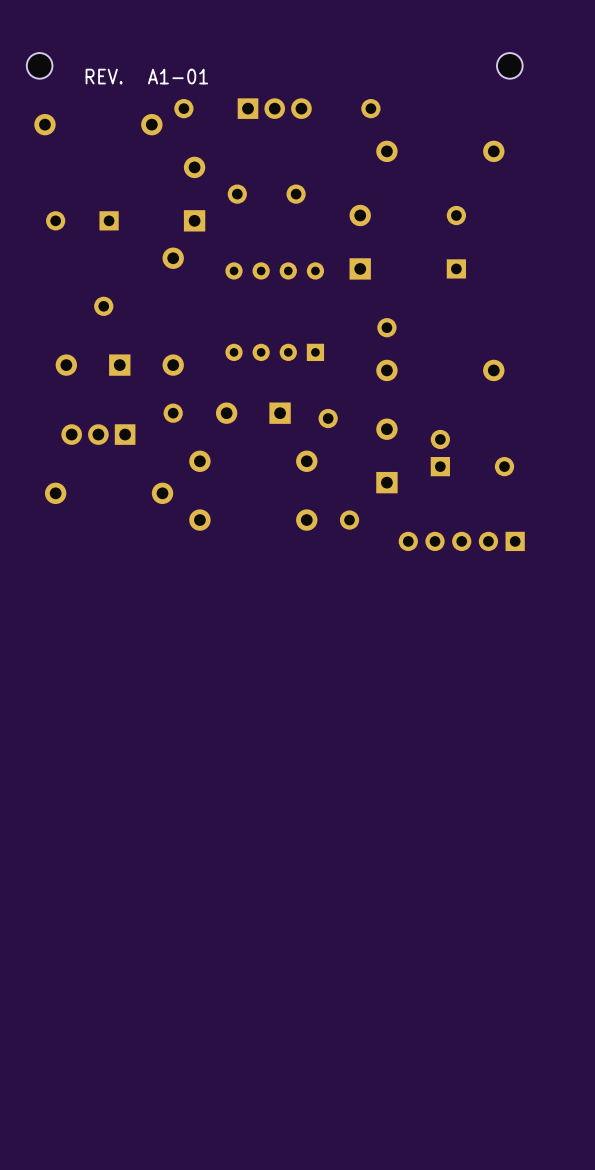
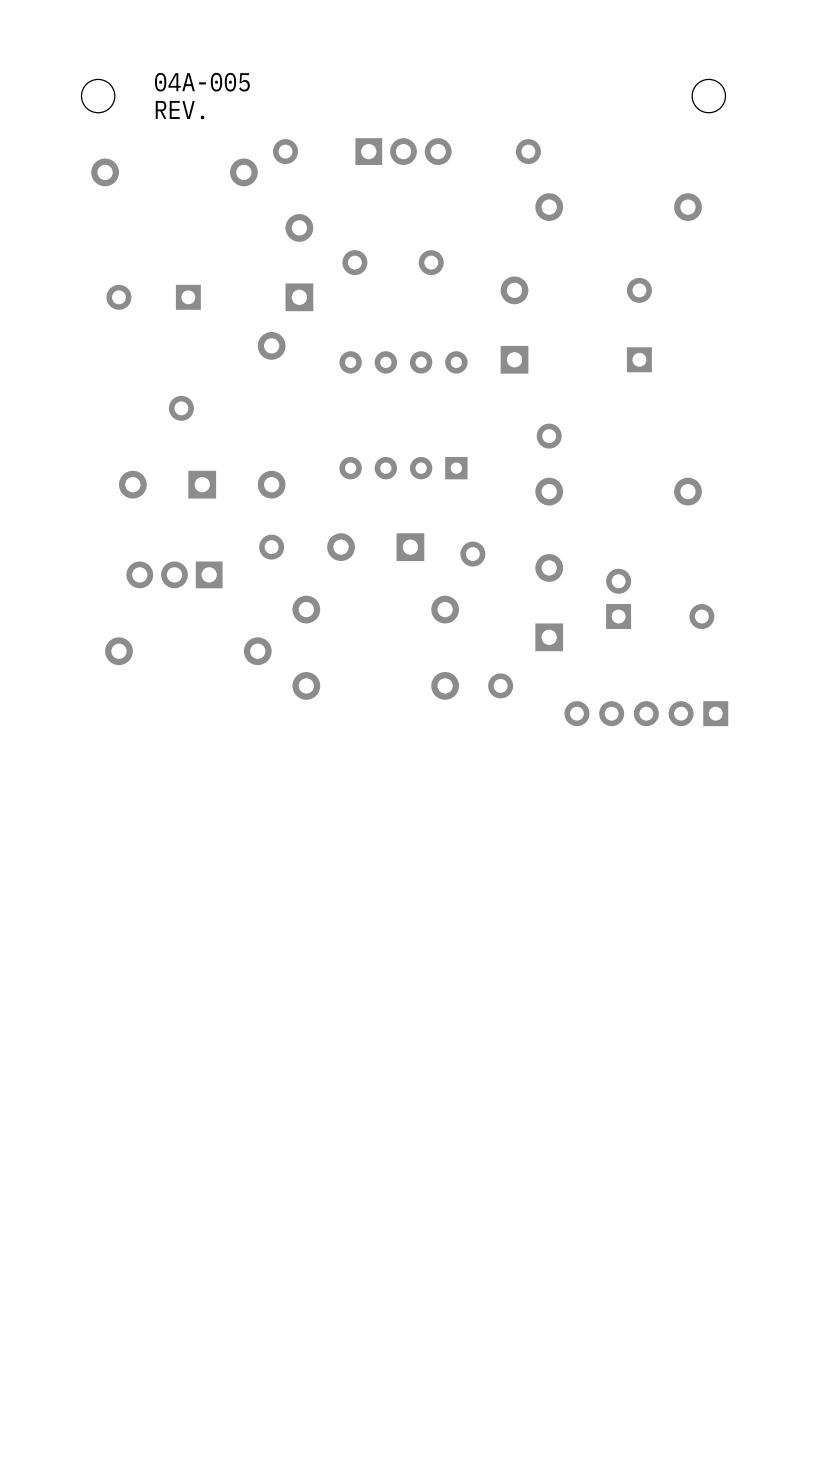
part text: none -> 04A-005 (202, 82)
part text: A1-01 (178, 76) -> none

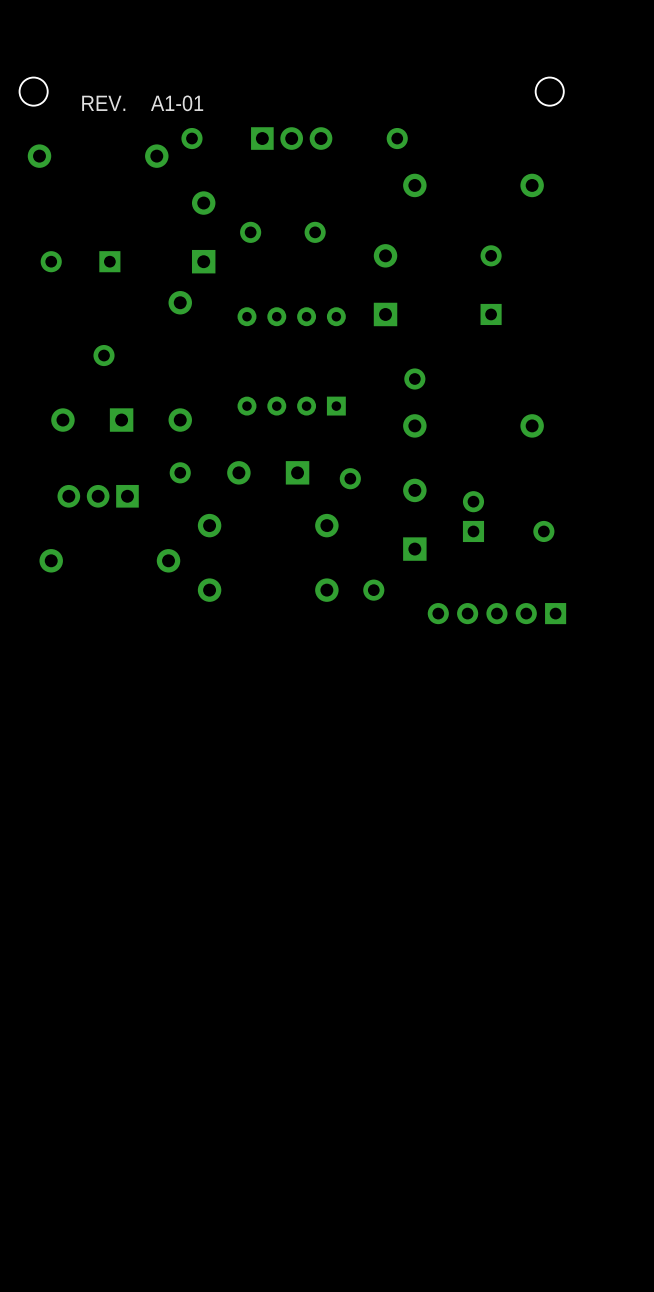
part text: 04A-005 (202, 82) -> none
part text: none -> A1-01 (177, 103)

